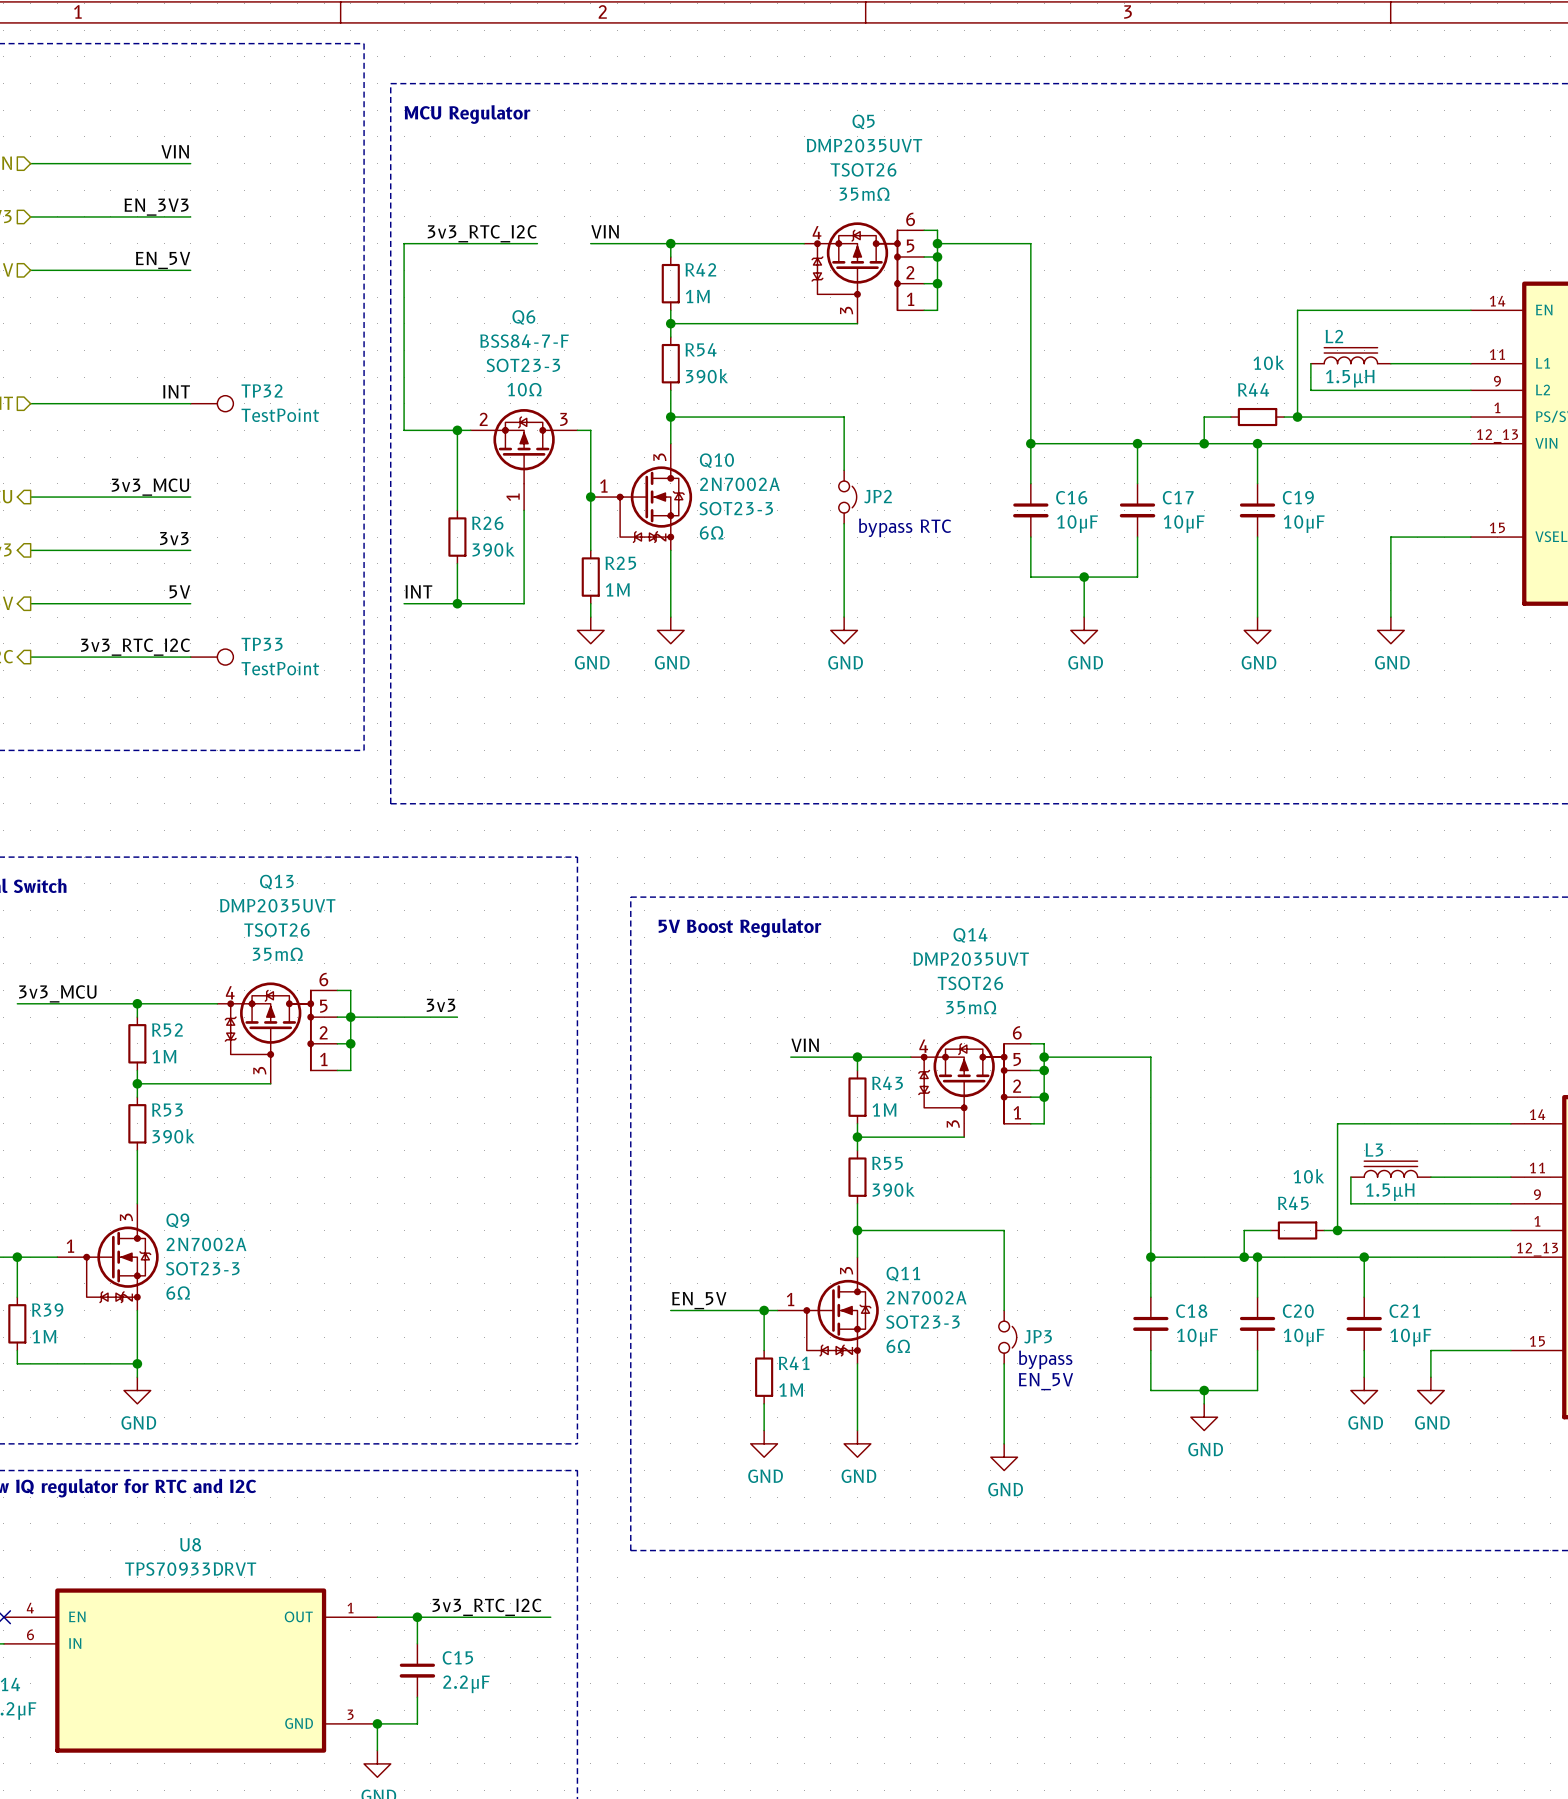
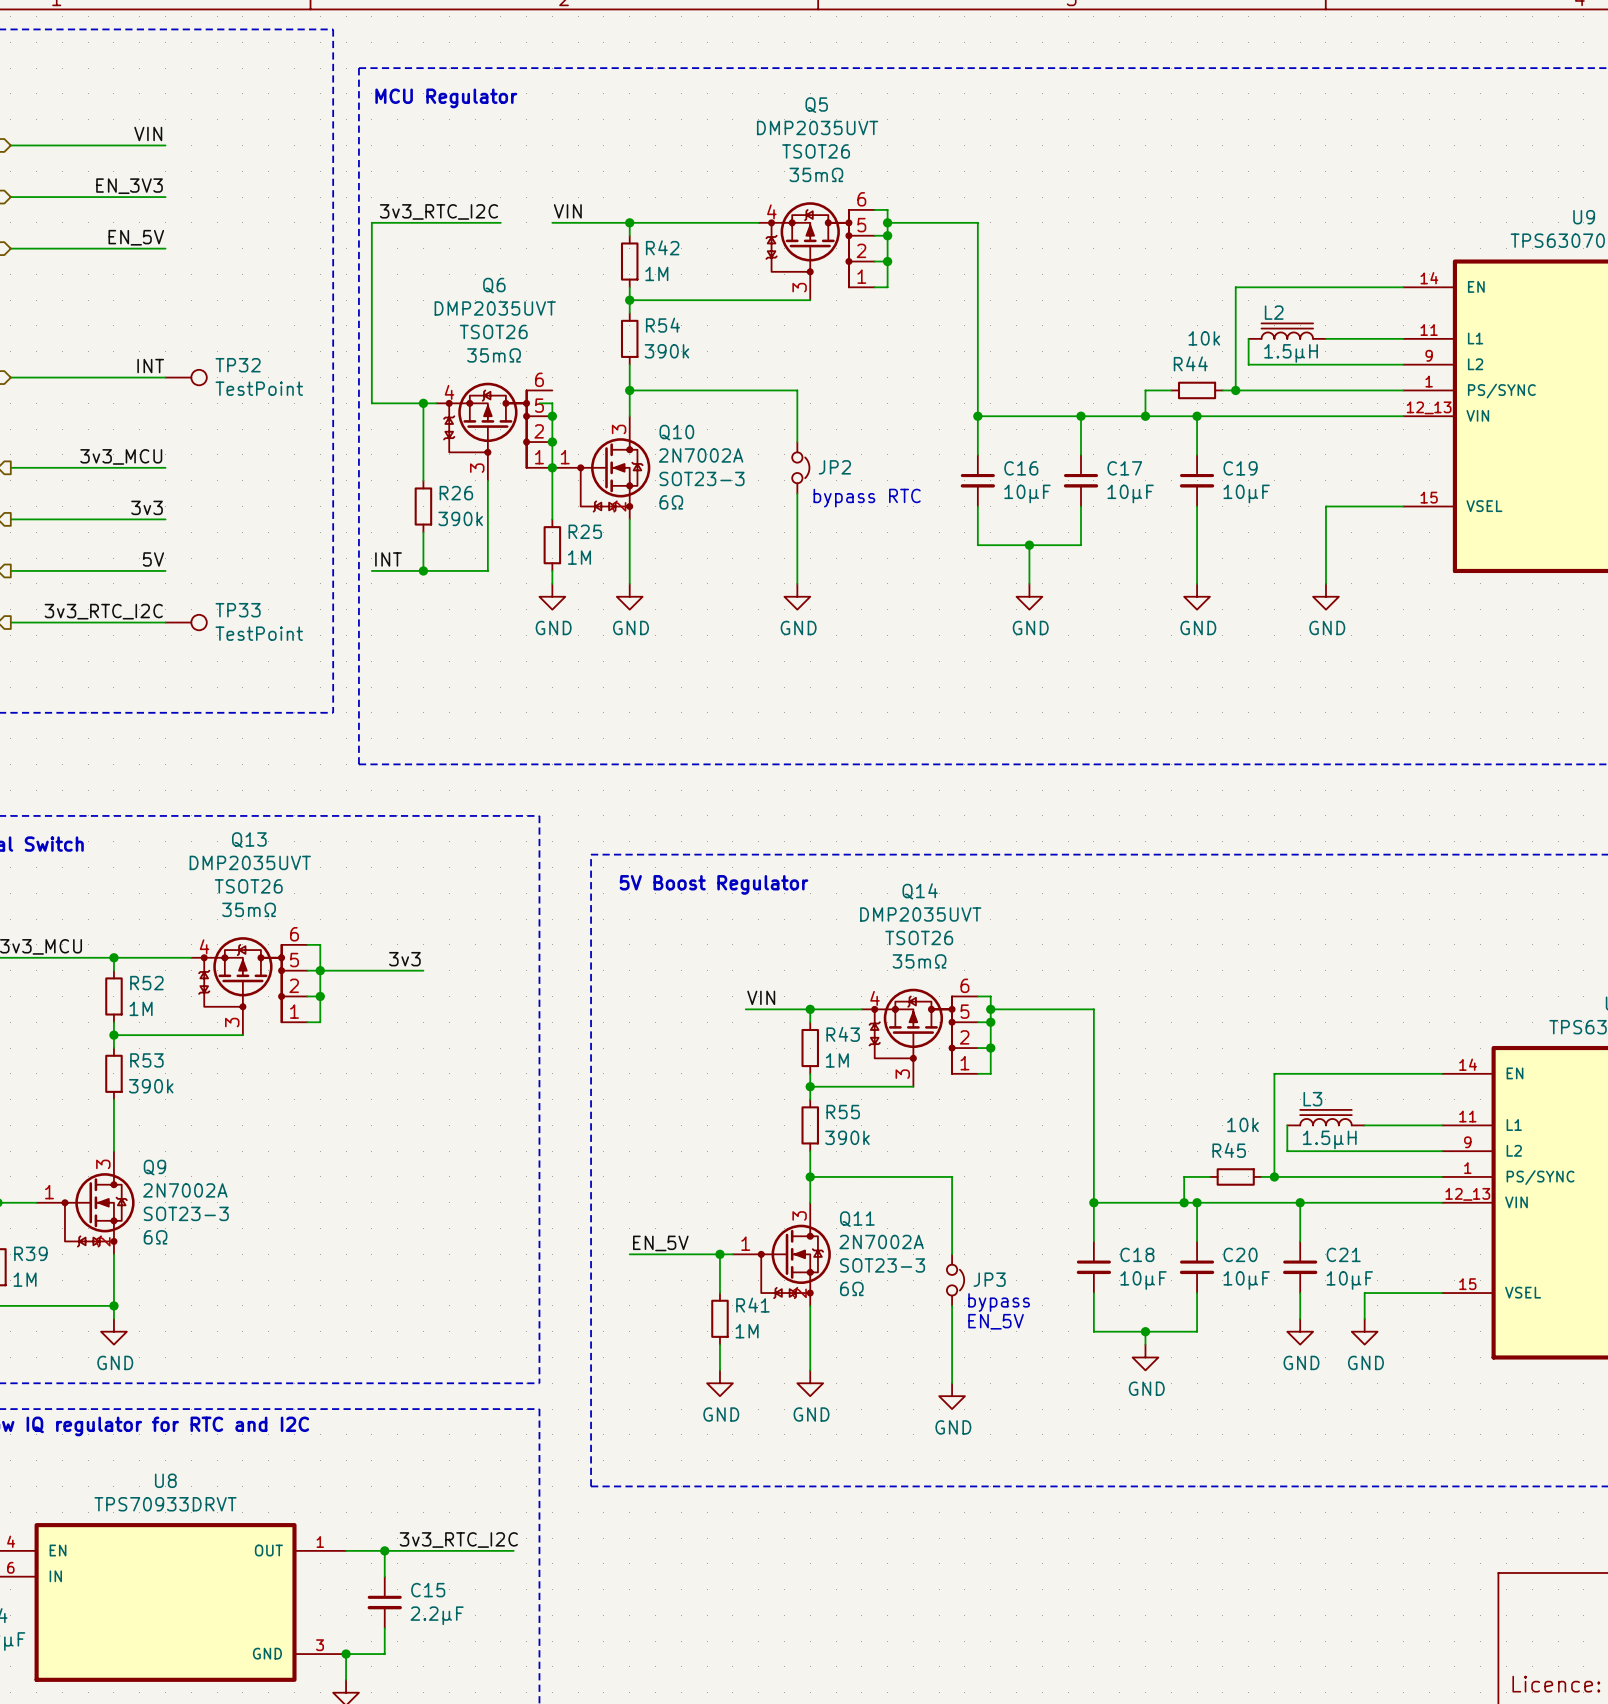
Q6 value: BSS84-7-F (524, 341) -> DMP2035UVT (495, 308)
Q6 text: SOT23-3 (523, 365) -> TSOT26 (493, 331)
Q6 text: 10Ω (524, 389) -> 35mΩ (494, 355)
Q6 symbol: [470, 409, 578, 511] -> [436, 382, 553, 481]
junction: none -> (552, 416)
junction: none -> (552, 442)

